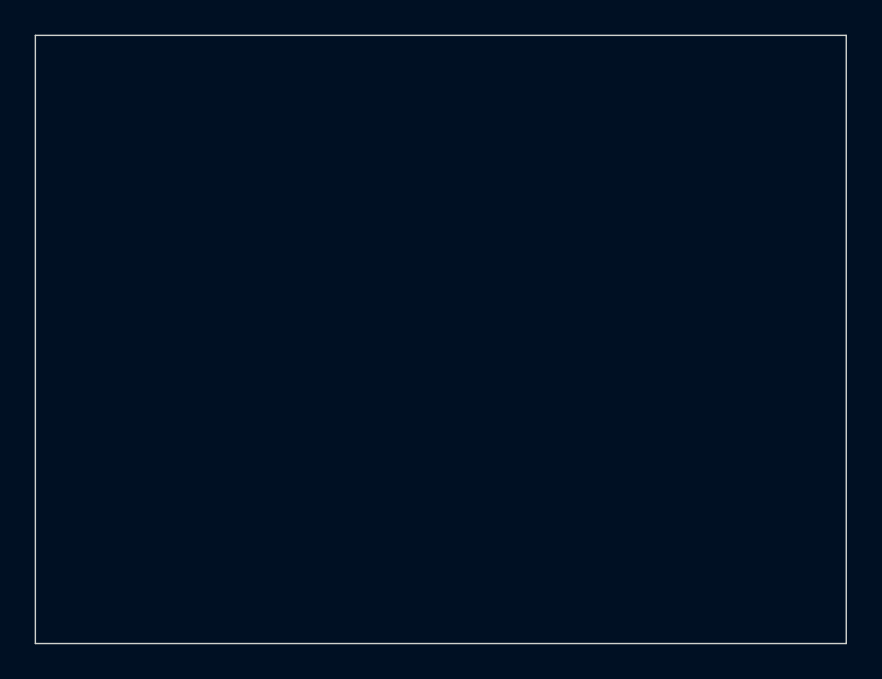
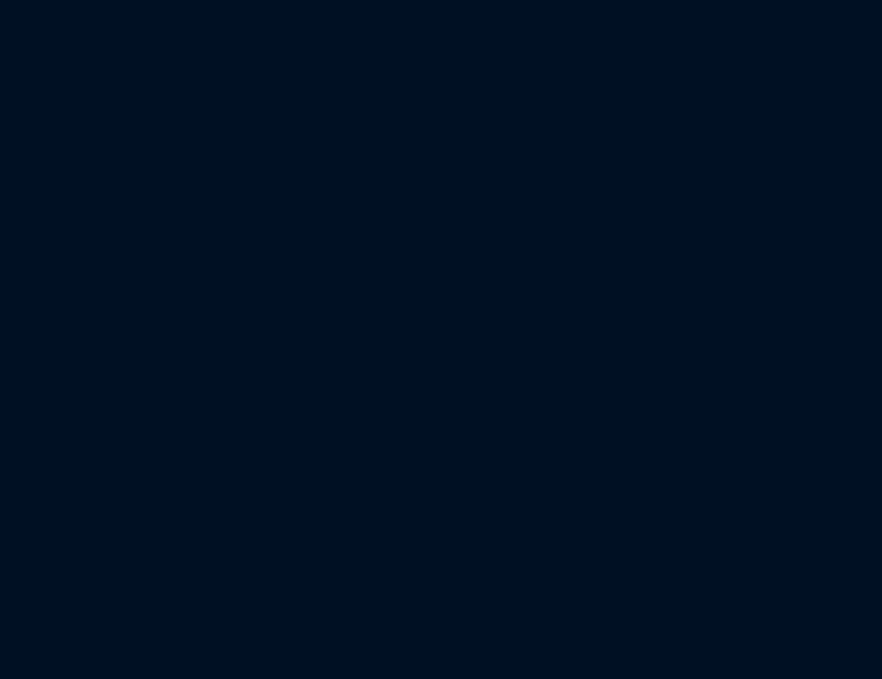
board edge: (846, 35) (846, 643) (35, 643) (35, 35) (846, 35) -> none

